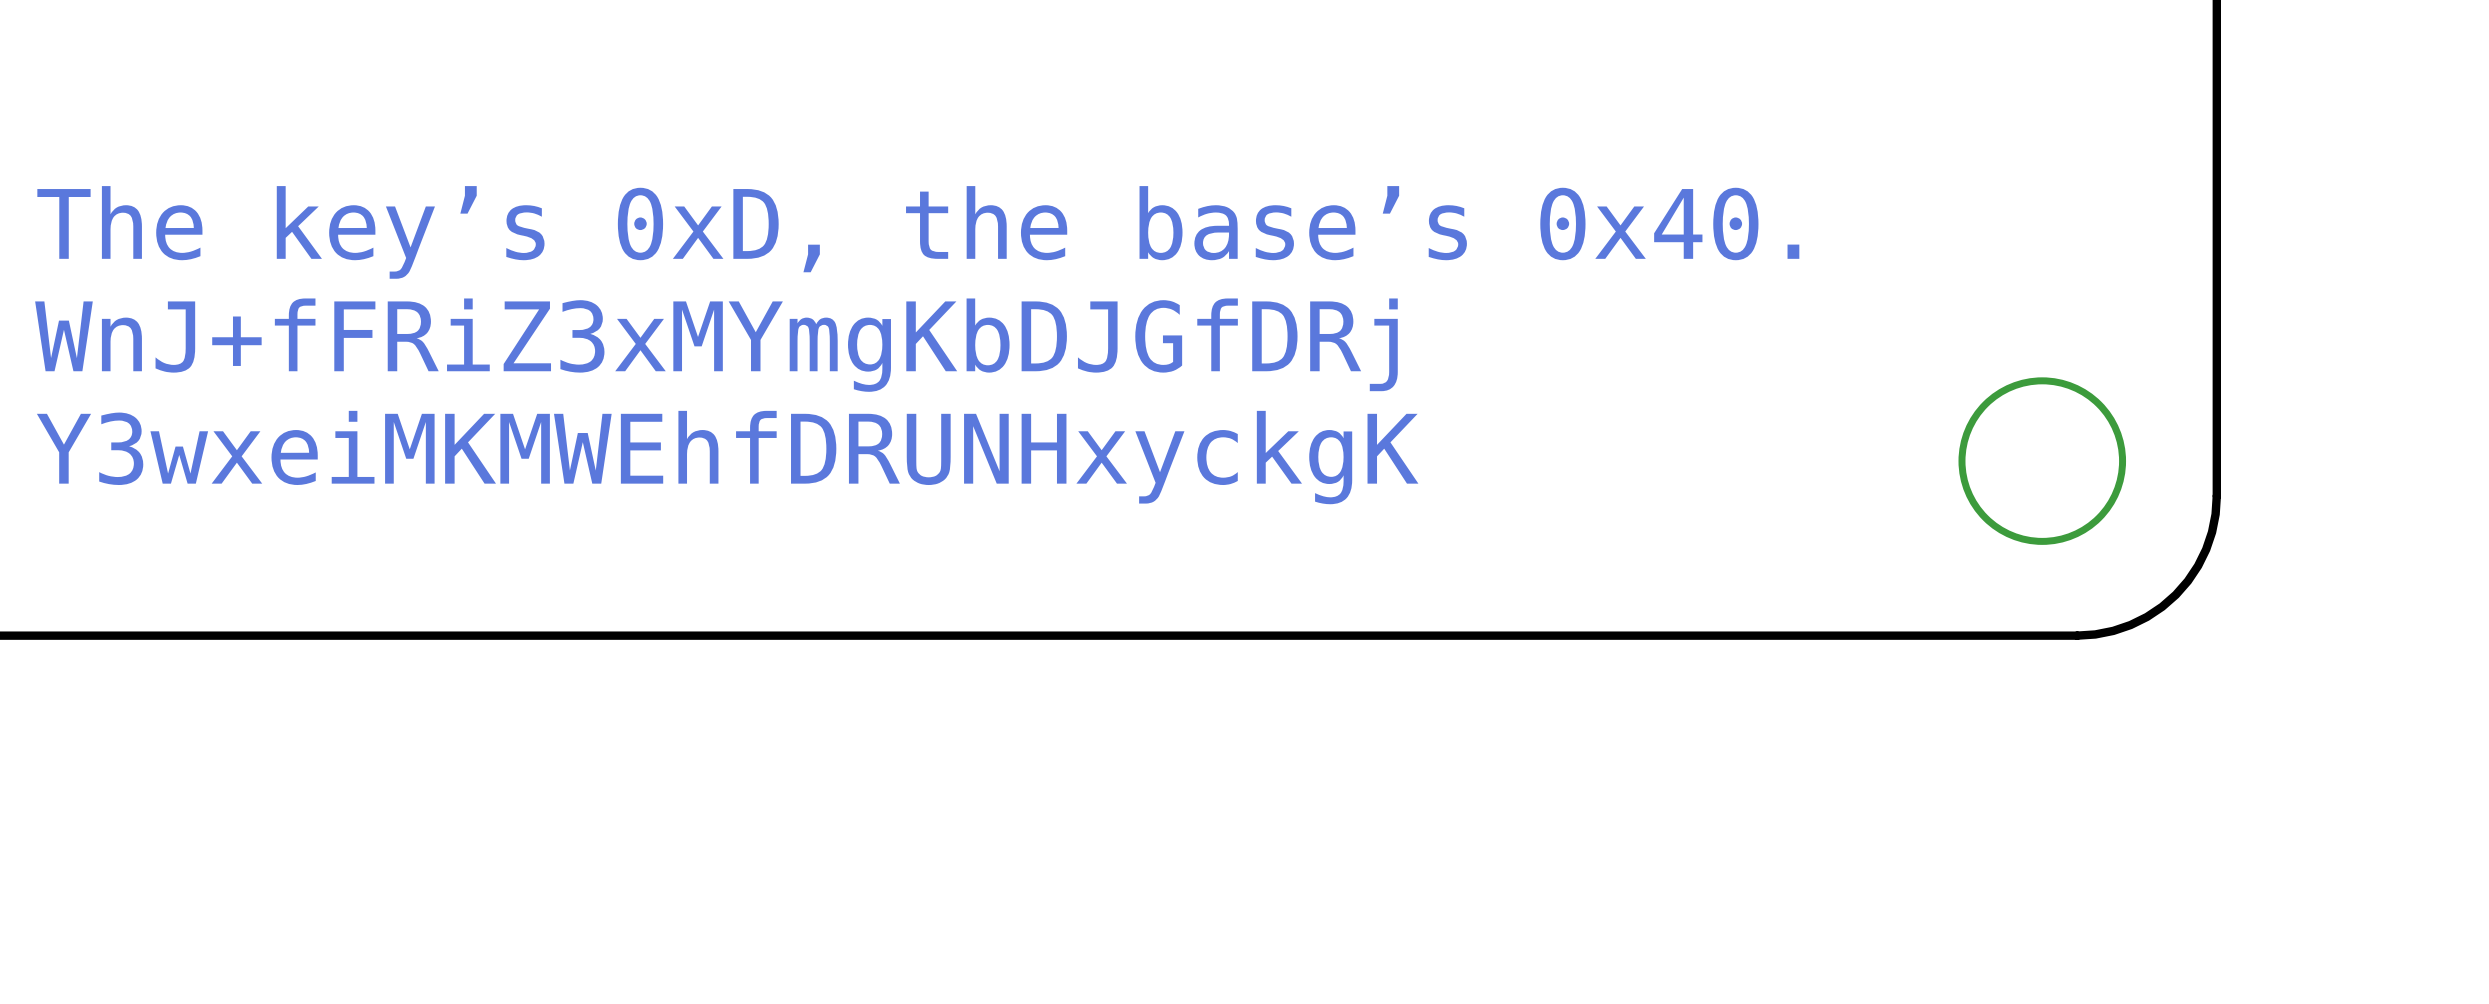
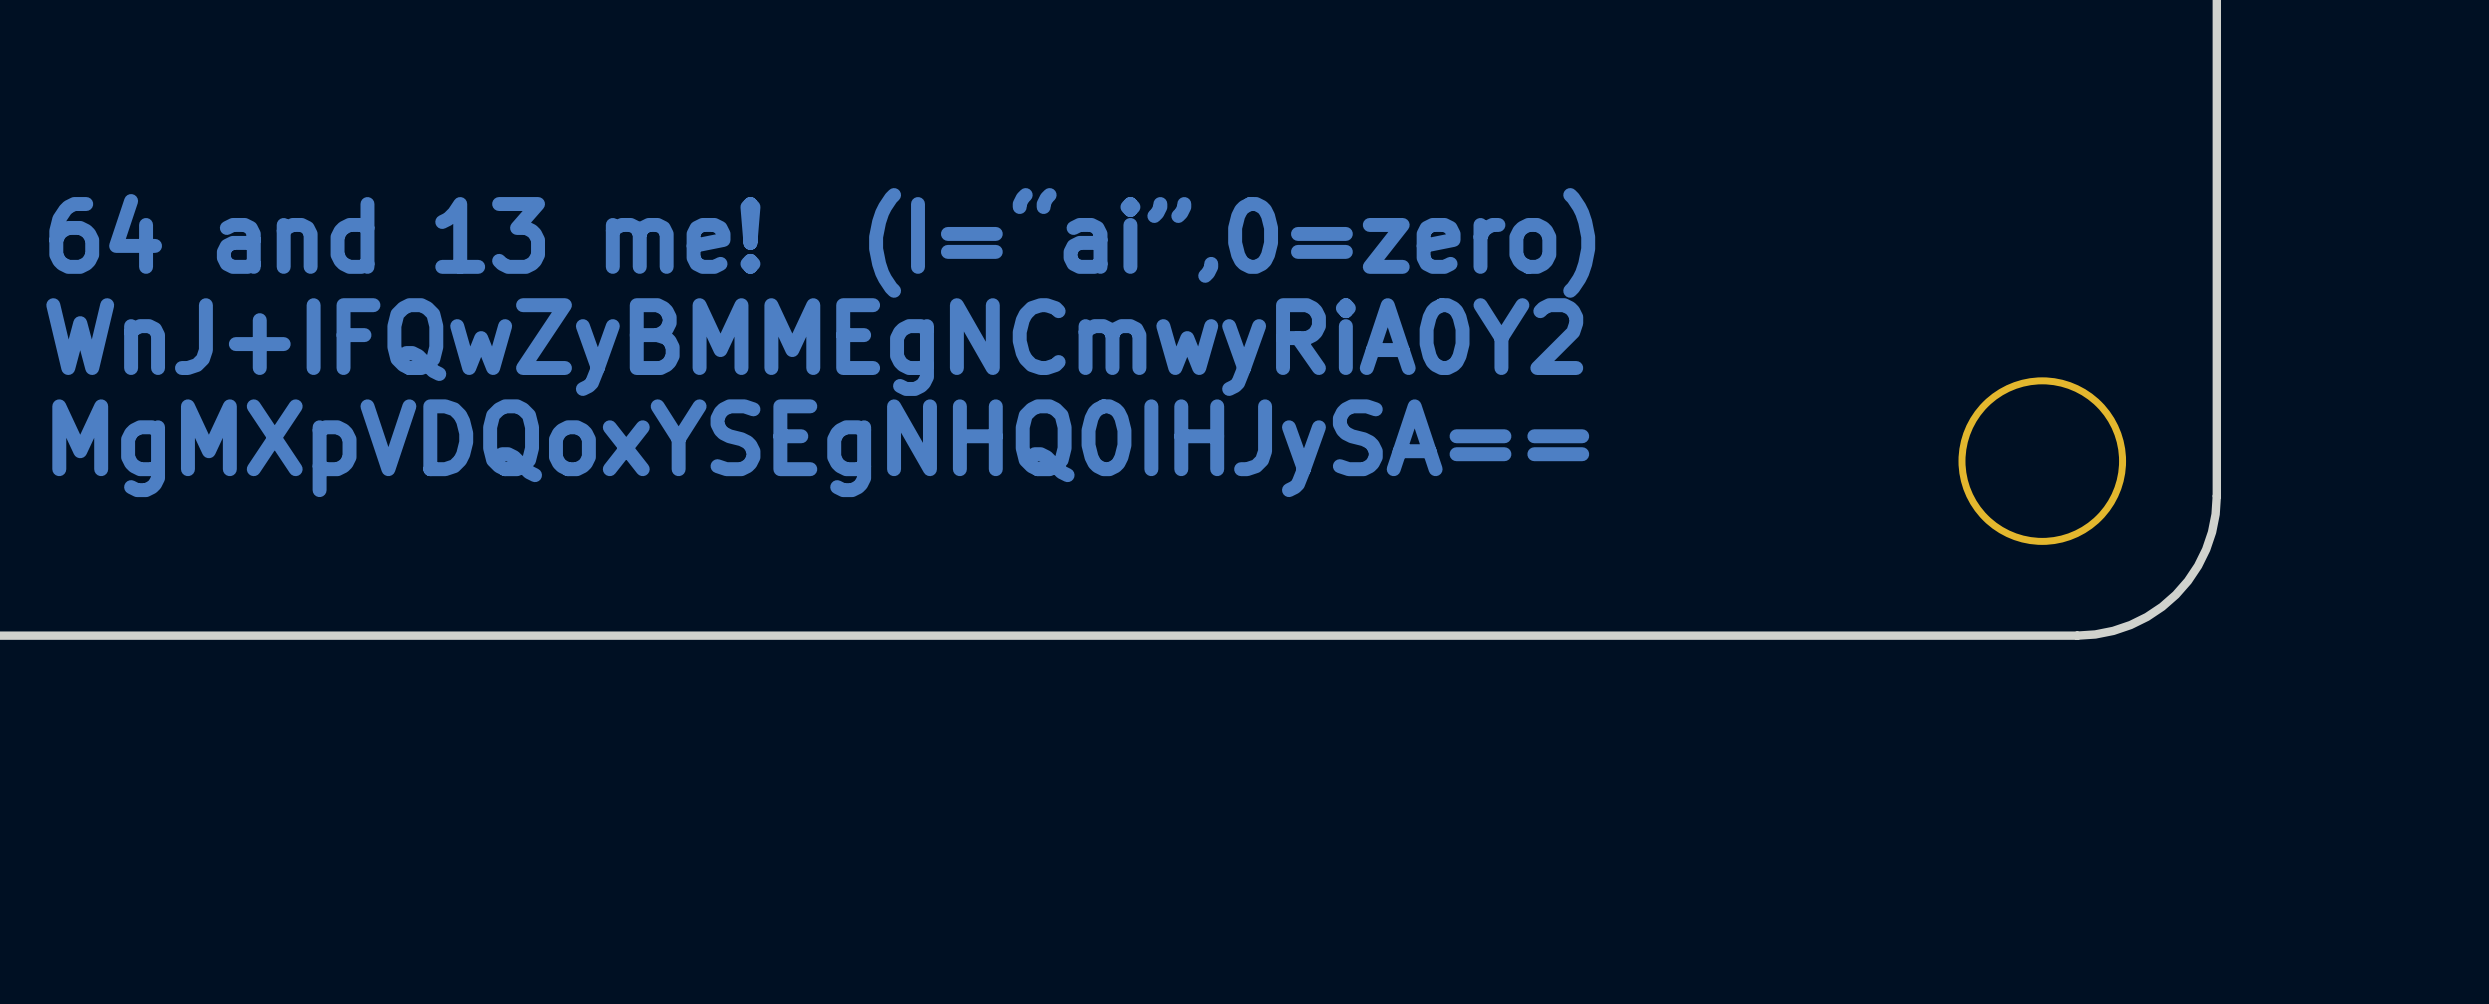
text: The key’s 0xD, the base’s 0x40. (918, 232) -> 64 and 13 me! (I=“ai”,0=zero) (822, 242)
text: WnJ+fFRiZ3xMYmgKbDJGfDRj (716, 345) -> WnJ+IFQwZyBMMEgNCmwyRiA0Y2 (814, 347)
text: Y3wxeiMKMWEhfDRUNHxyckgK (727, 457) -> MgMXpVDQoxYSEgNHQ0IHJySA== (820, 448)

